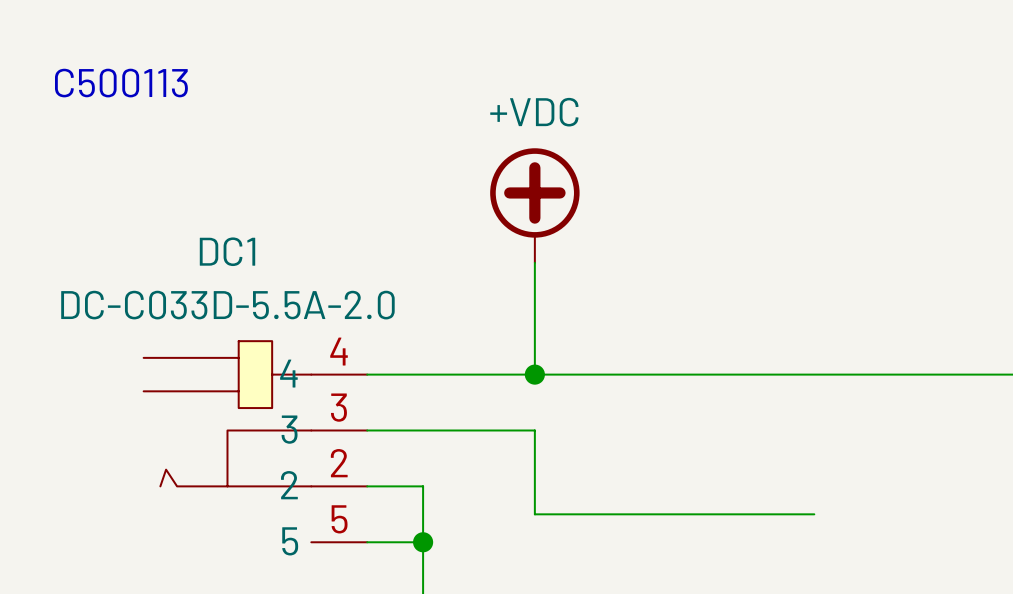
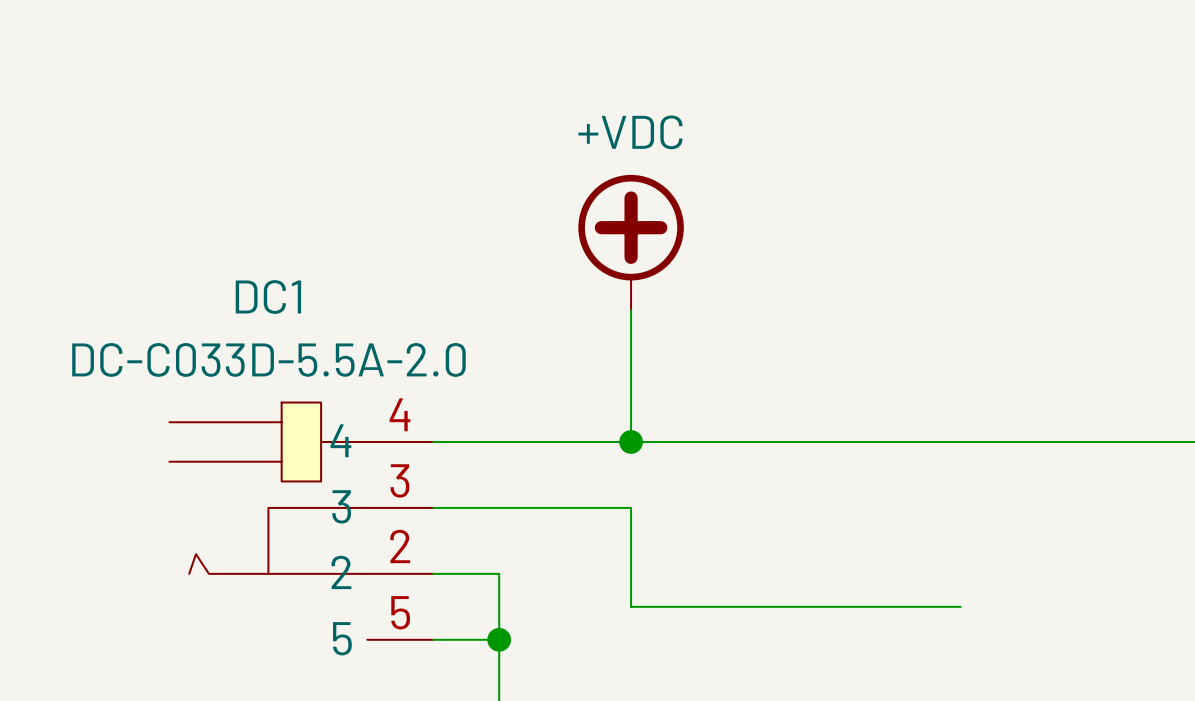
text: C500113 (121, 83) -> none

